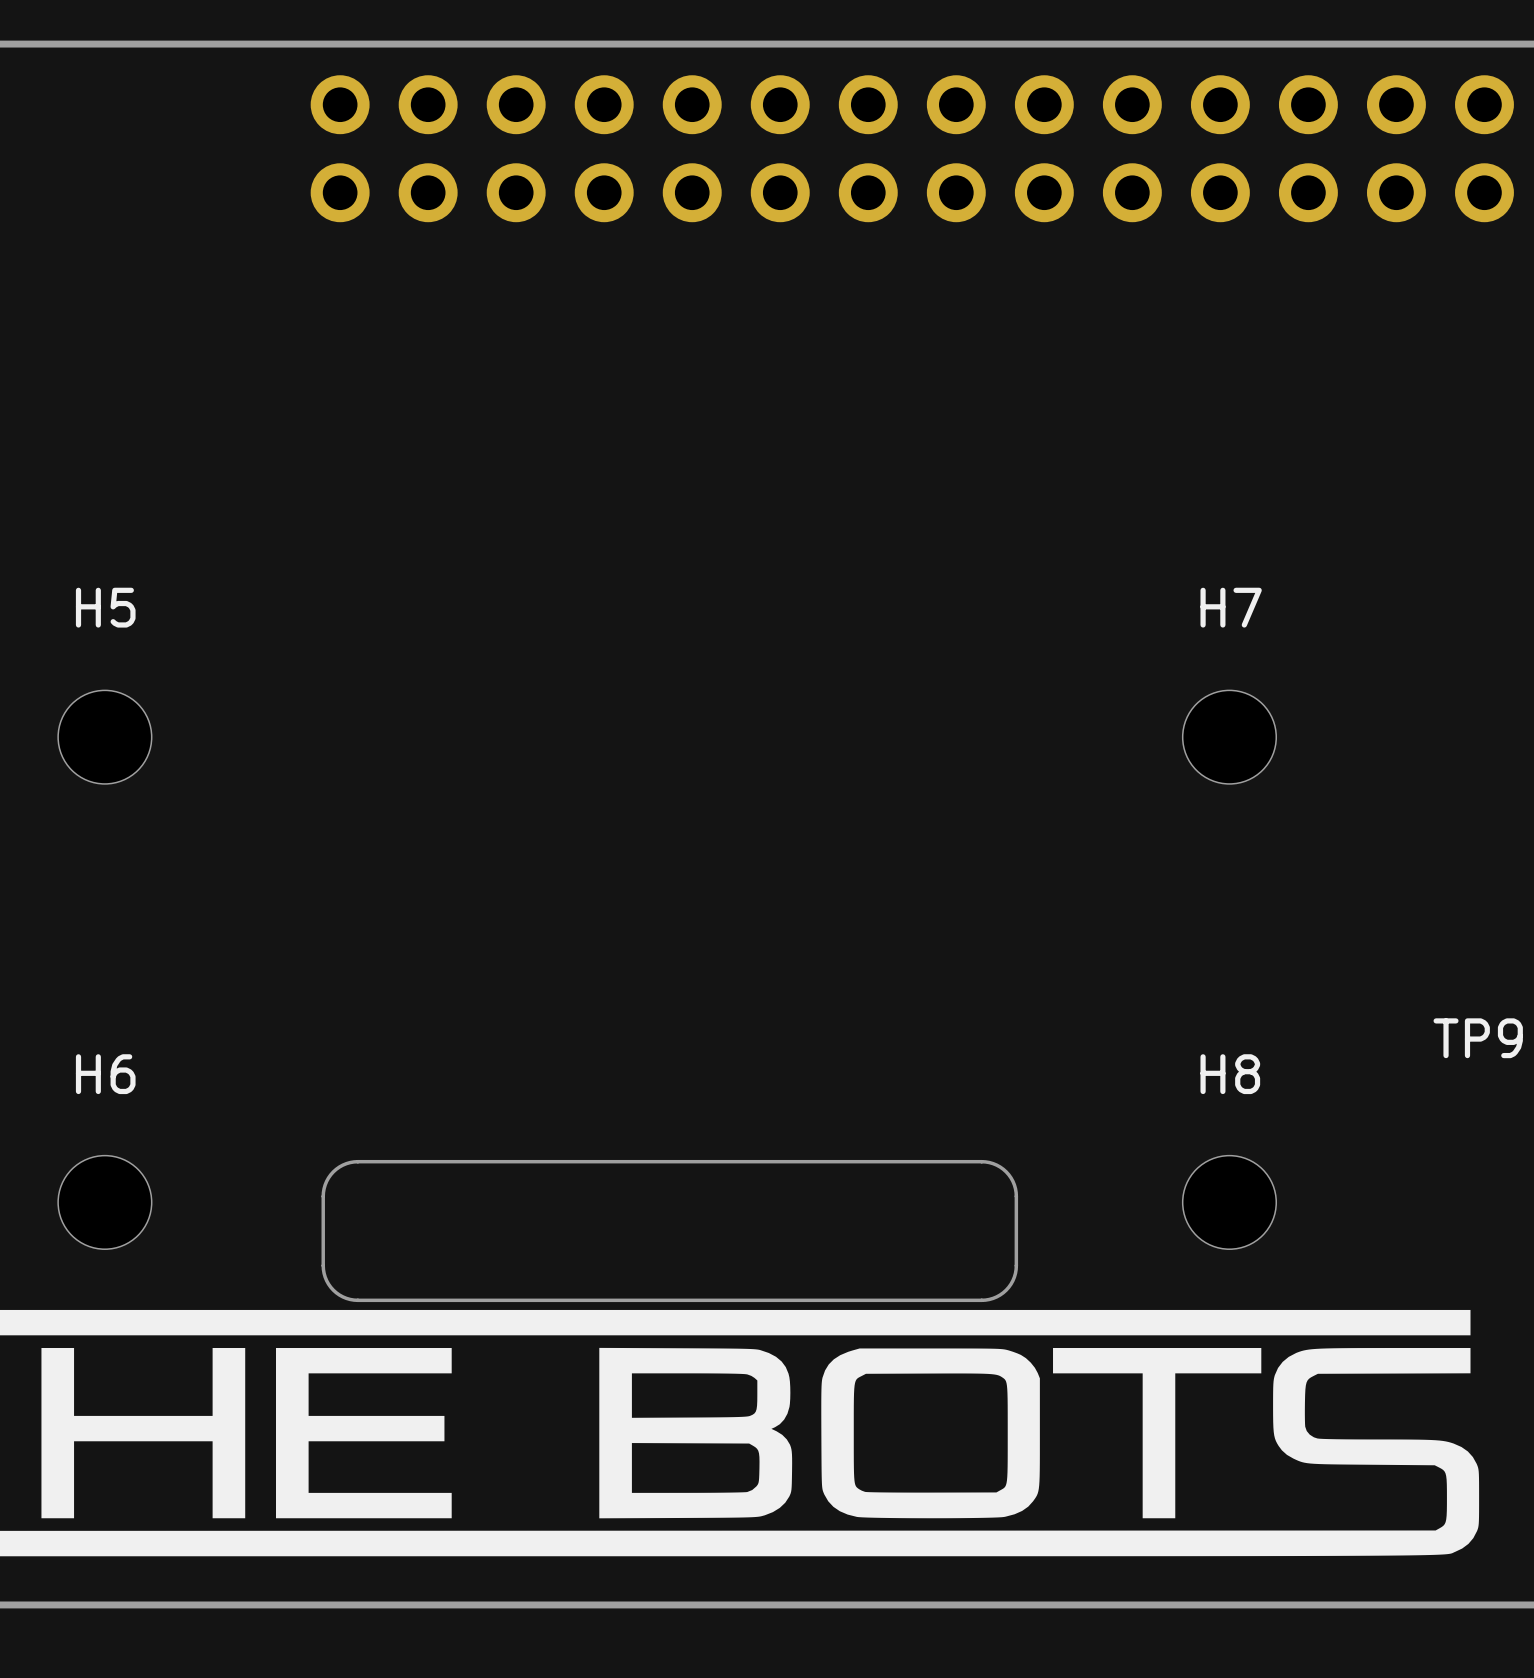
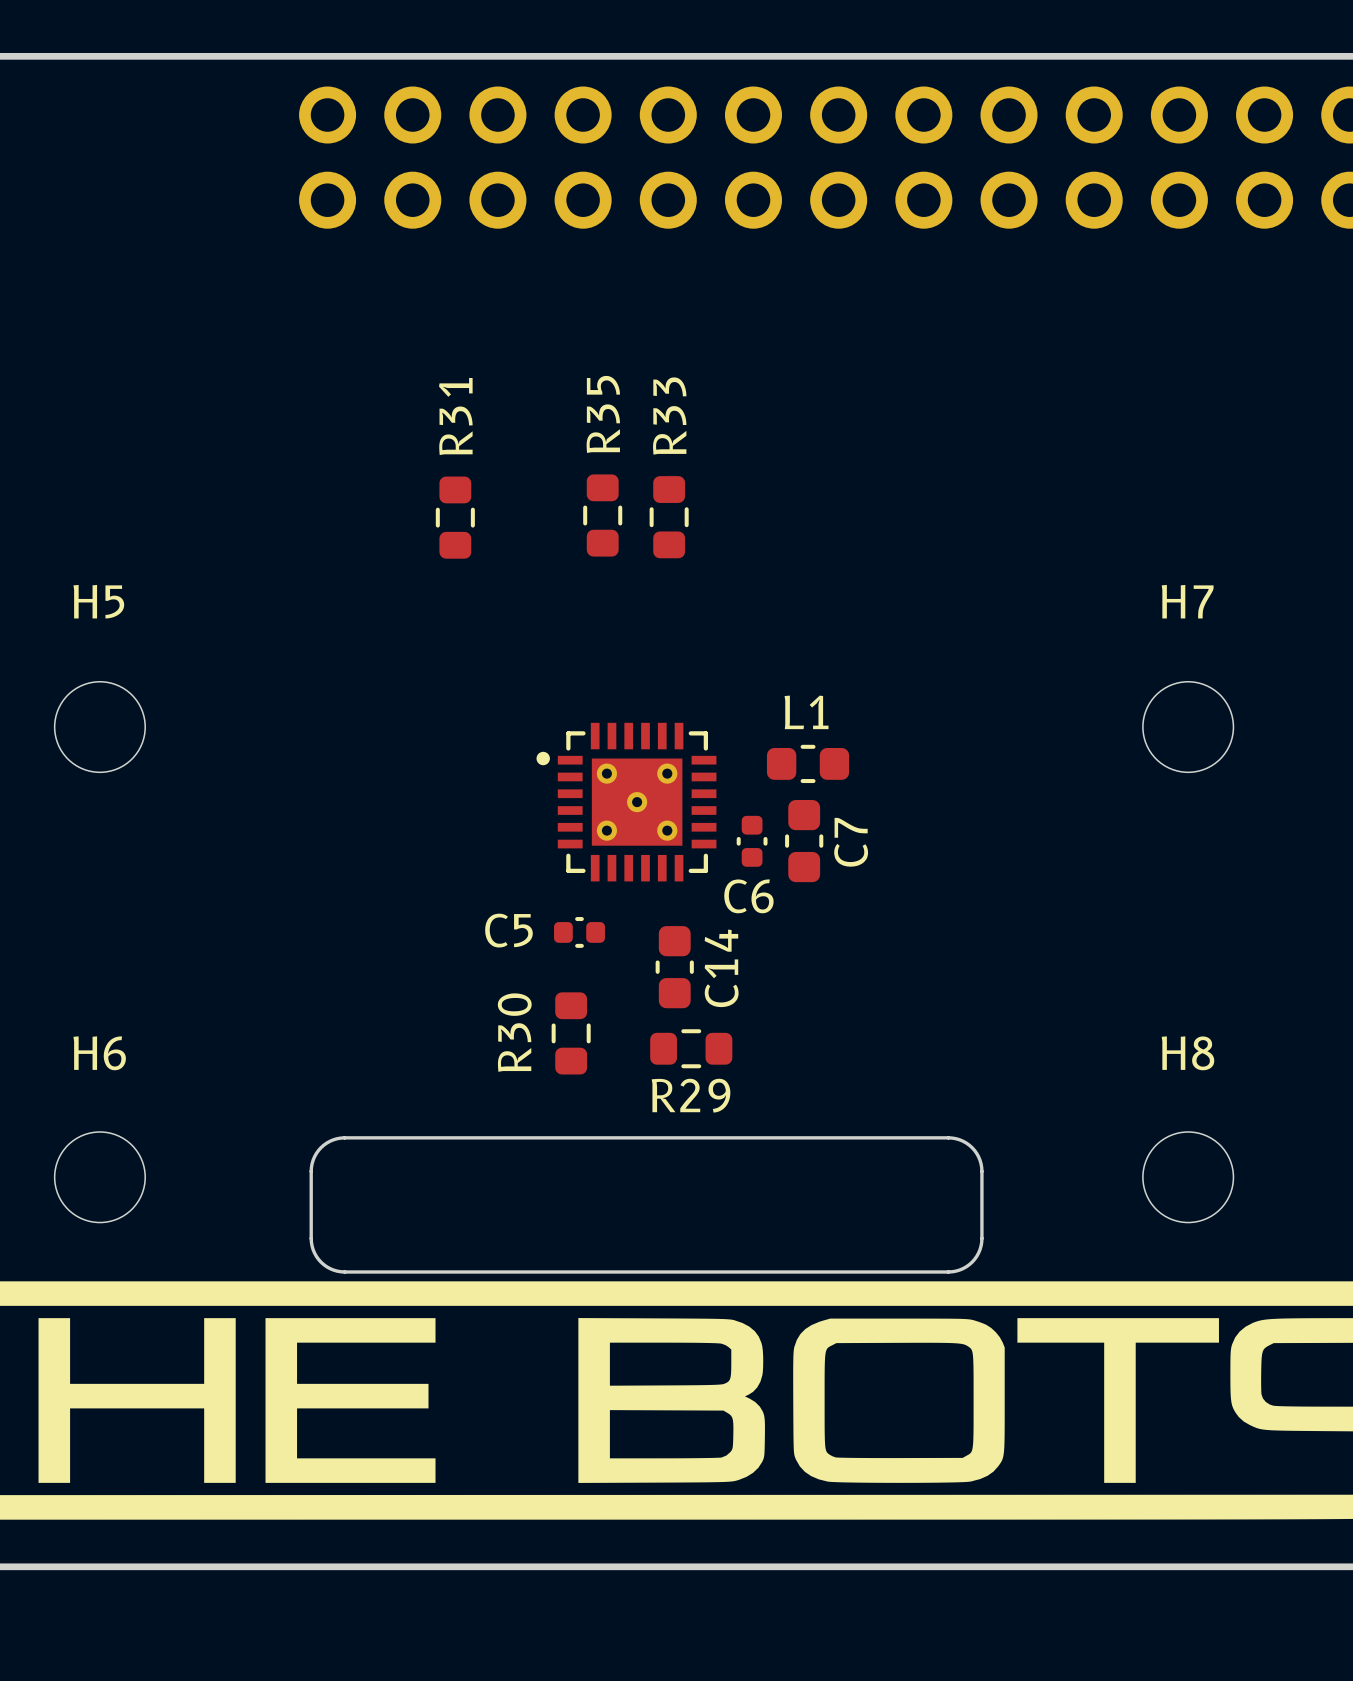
R35: none -> (602, 515)
R31: none -> (455, 517)
R33: none -> (669, 517)
L1: none -> (808, 763)
part: none -> (626, 802)
C6: none -> (752, 841)
C7: none -> (804, 841)
C5: none -> (579, 932)
C14: none -> (674, 967)
R30: none -> (571, 1033)
R29: none -> (691, 1048)

